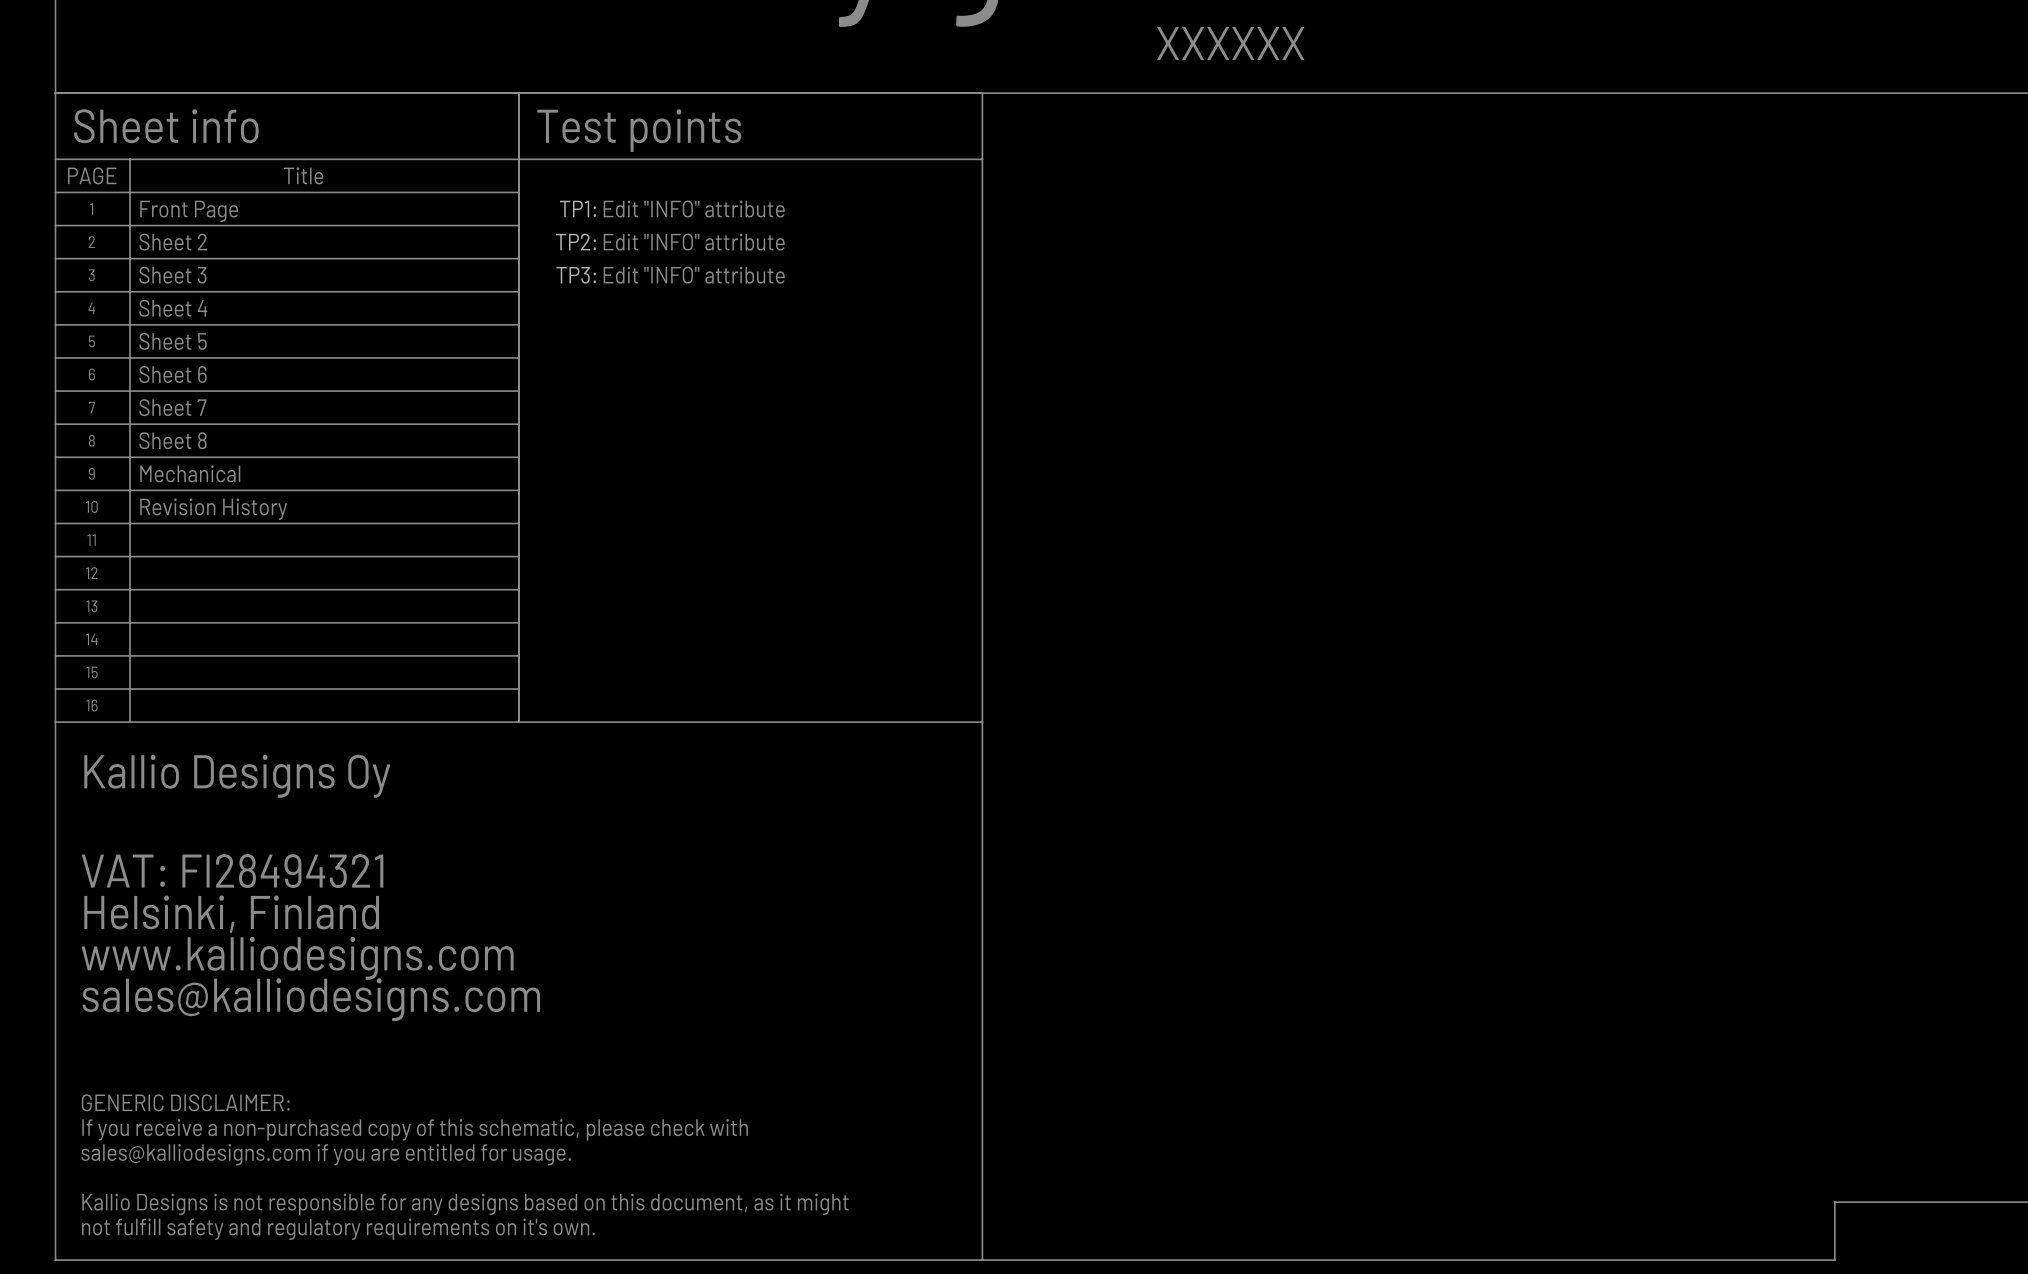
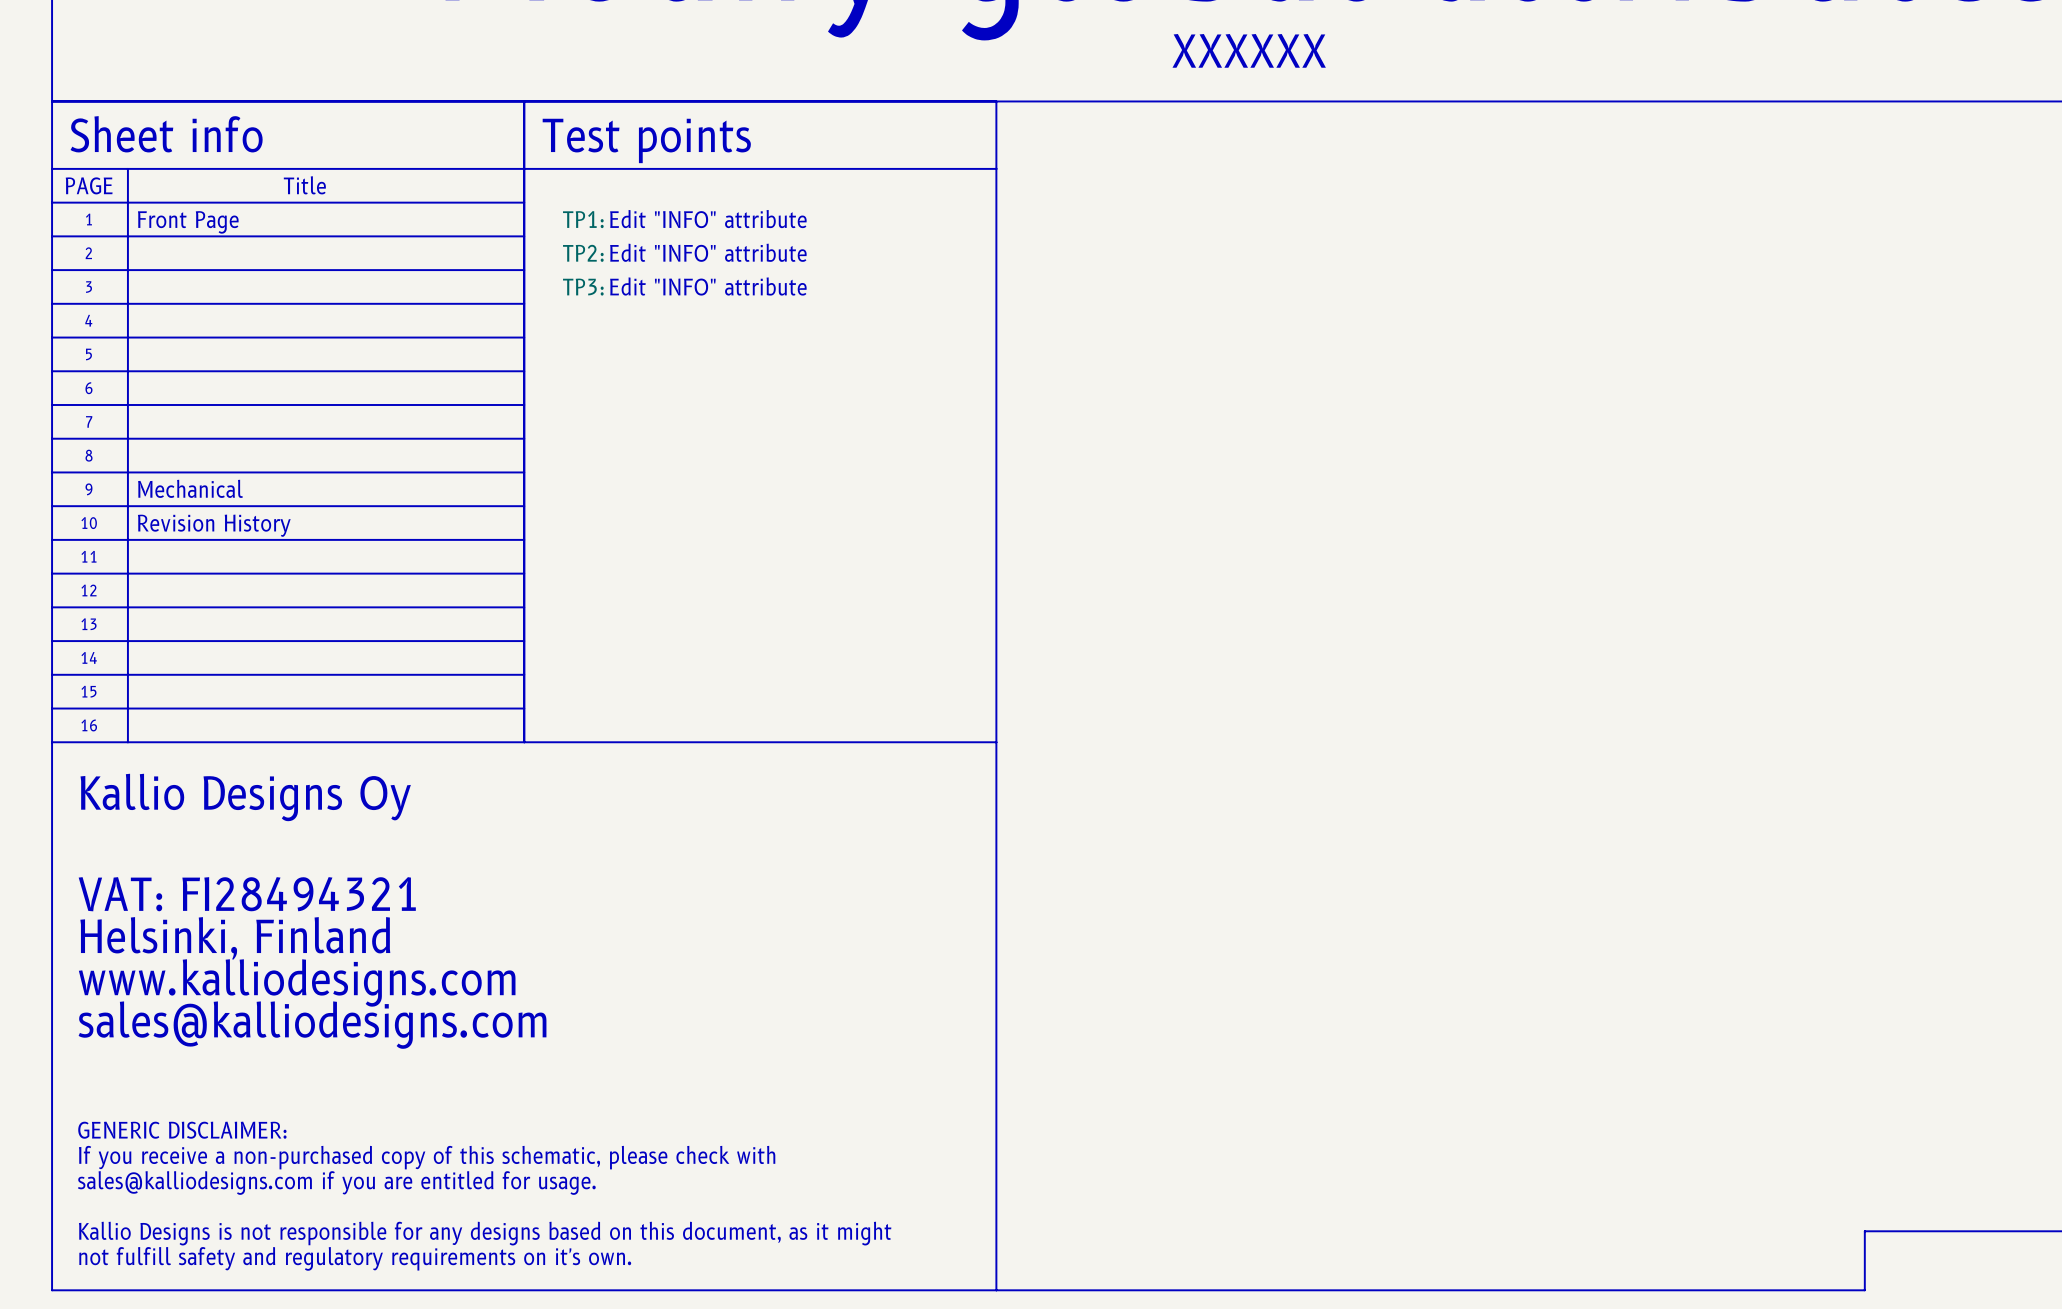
text: Sheet 2 (173, 242) -> none
text: Sheet 3 (172, 275) -> none
text: Sheet 4 (173, 308) -> none
text: Sheet 5 (173, 341) -> none
text: Sheet 6 (173, 374) -> none
text: Sheet 7 (172, 407) -> none
text: Sheet 8 (172, 440) -> none

